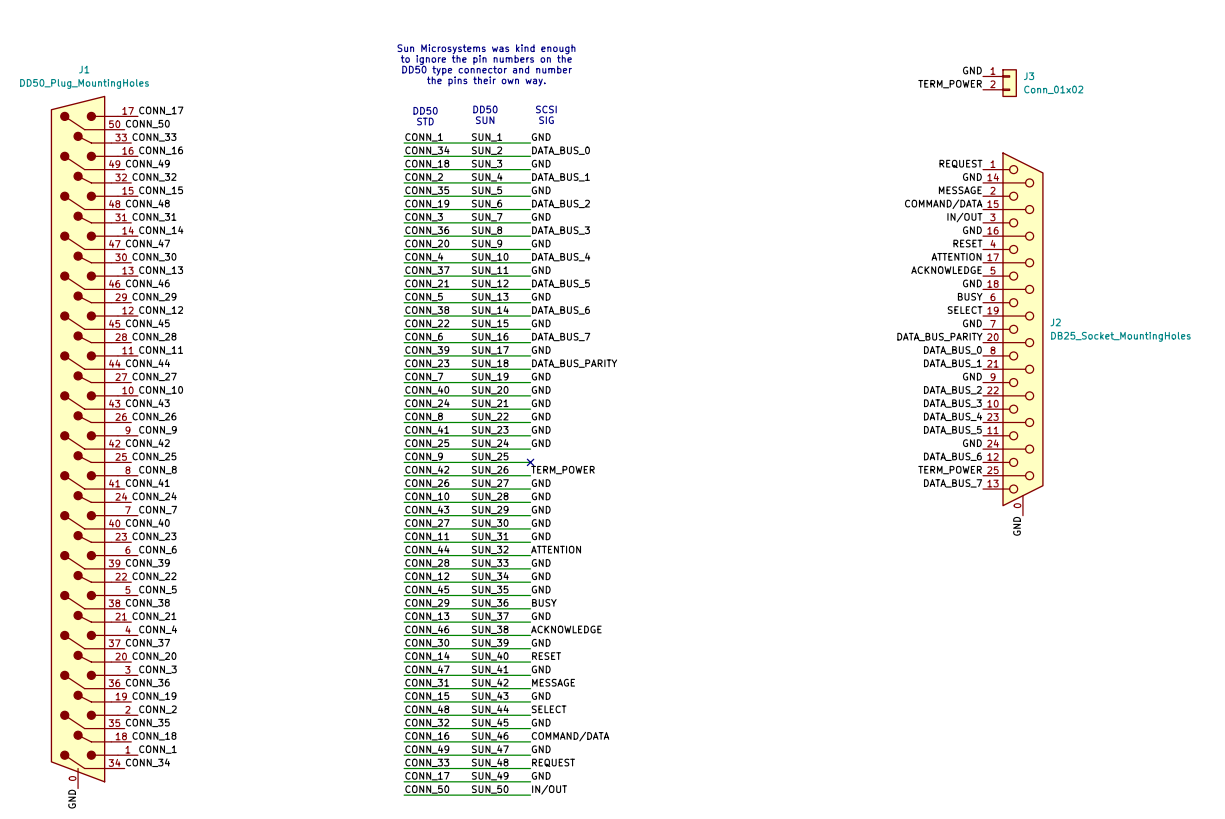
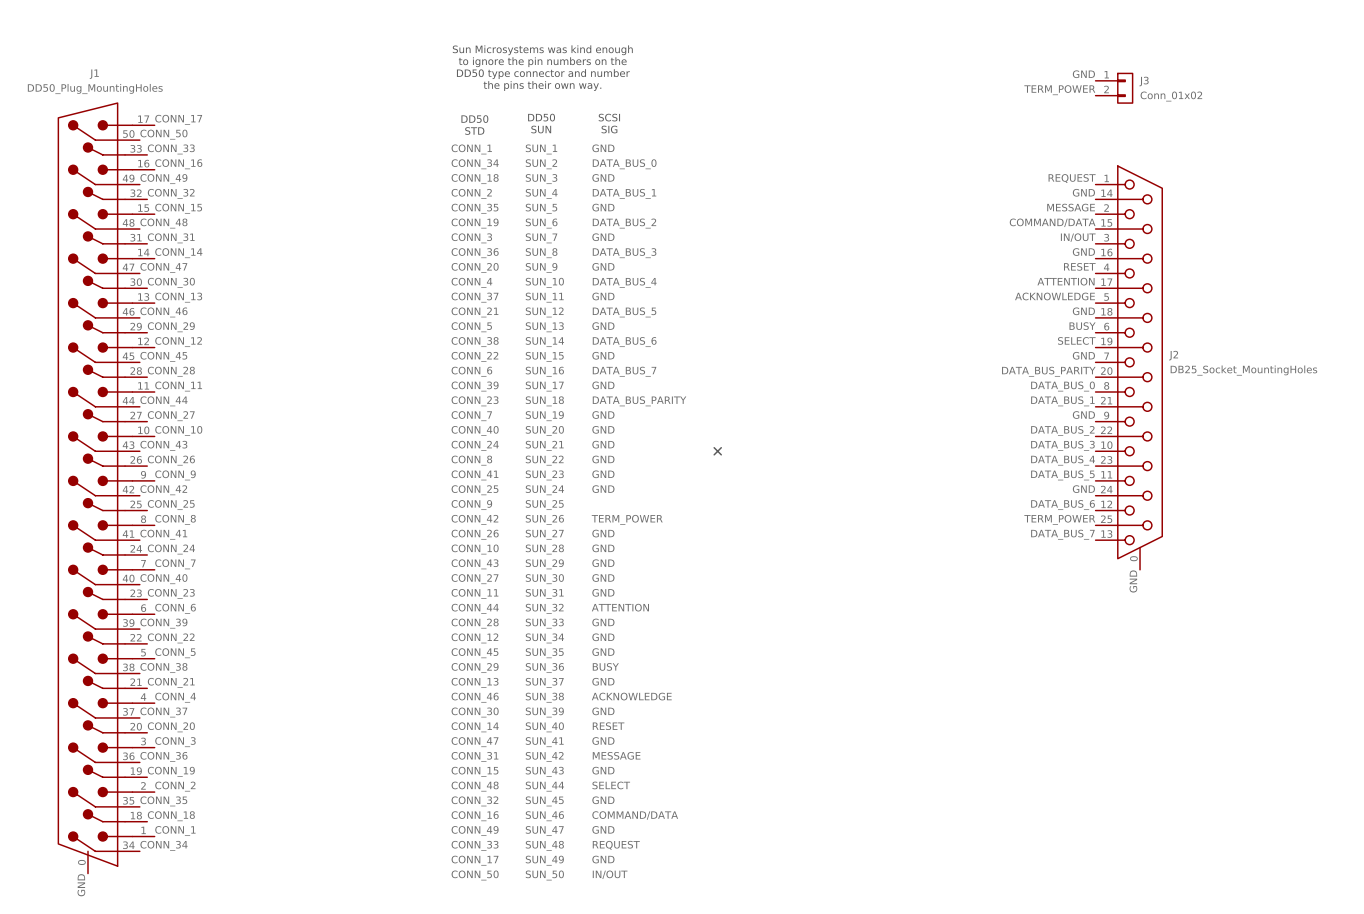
wire: (404, 143) (530, 143) -> none
wire: (404, 156) (530, 156) -> none
wire: (404, 169) (530, 169) -> none
wire: (404, 182) (530, 182) -> none
wire: (404, 196) (530, 196) -> none
wire: (404, 209) (530, 209) -> none
wire: (404, 222) (530, 222) -> none
wire: (404, 236) (530, 236) -> none
wire: (404, 249) (530, 249) -> none
wire: (404, 262) (530, 262) -> none
wire: (404, 276) (530, 276) -> none
wire: (404, 289) (530, 289) -> none
wire: (404, 302) (530, 302) -> none
wire: (404, 316) (530, 316) -> none
wire: (404, 329) (530, 329) -> none
wire: (404, 342) (530, 342) -> none
wire: (404, 355) (530, 355) -> none
wire: (404, 369) (530, 369) -> none
wire: (404, 382) (530, 382) -> none
wire: (404, 395) (530, 395) -> none
wire: (404, 409) (530, 409) -> none
no-connect mark: none -> (717, 451)
wire: (404, 422) (530, 422) -> none
wire: (404, 435) (530, 435) -> none
wire: (404, 449) (530, 449) -> none
wire: (404, 462) (530, 462) -> none
no-connect mark: (530, 462) -> none
wire: (404, 475) (530, 475) -> none
wire: (404, 489) (530, 489) -> none
wire: (404, 502) (530, 502) -> none
wire: (404, 515) (530, 515) -> none
wire: (404, 528) (530, 528) -> none
wire: (404, 542) (530, 542) -> none
wire: (404, 555) (530, 555) -> none
wire: (404, 568) (530, 568) -> none
wire: (404, 582) (530, 582) -> none
wire: (404, 595) (530, 595) -> none
wire: (404, 608) (530, 608) -> none
wire: (404, 622) (530, 622) -> none
wire: (404, 635) (530, 635) -> none
wire: (404, 648) (530, 648) -> none
wire: (404, 662) (530, 662) -> none
wire: (404, 675) (530, 675) -> none
wire: (404, 688) (530, 688) -> none
wire: (404, 701) (530, 701) -> none
wire: (404, 715) (530, 715) -> none
wire: (404, 728) (530, 728) -> none
wire: (404, 741) (530, 741) -> none
wire: (404, 755) (530, 755) -> none
wire: (404, 768) (530, 768) -> none
wire: (404, 781) (530, 781) -> none
wire: (404, 795) (530, 795) -> none

